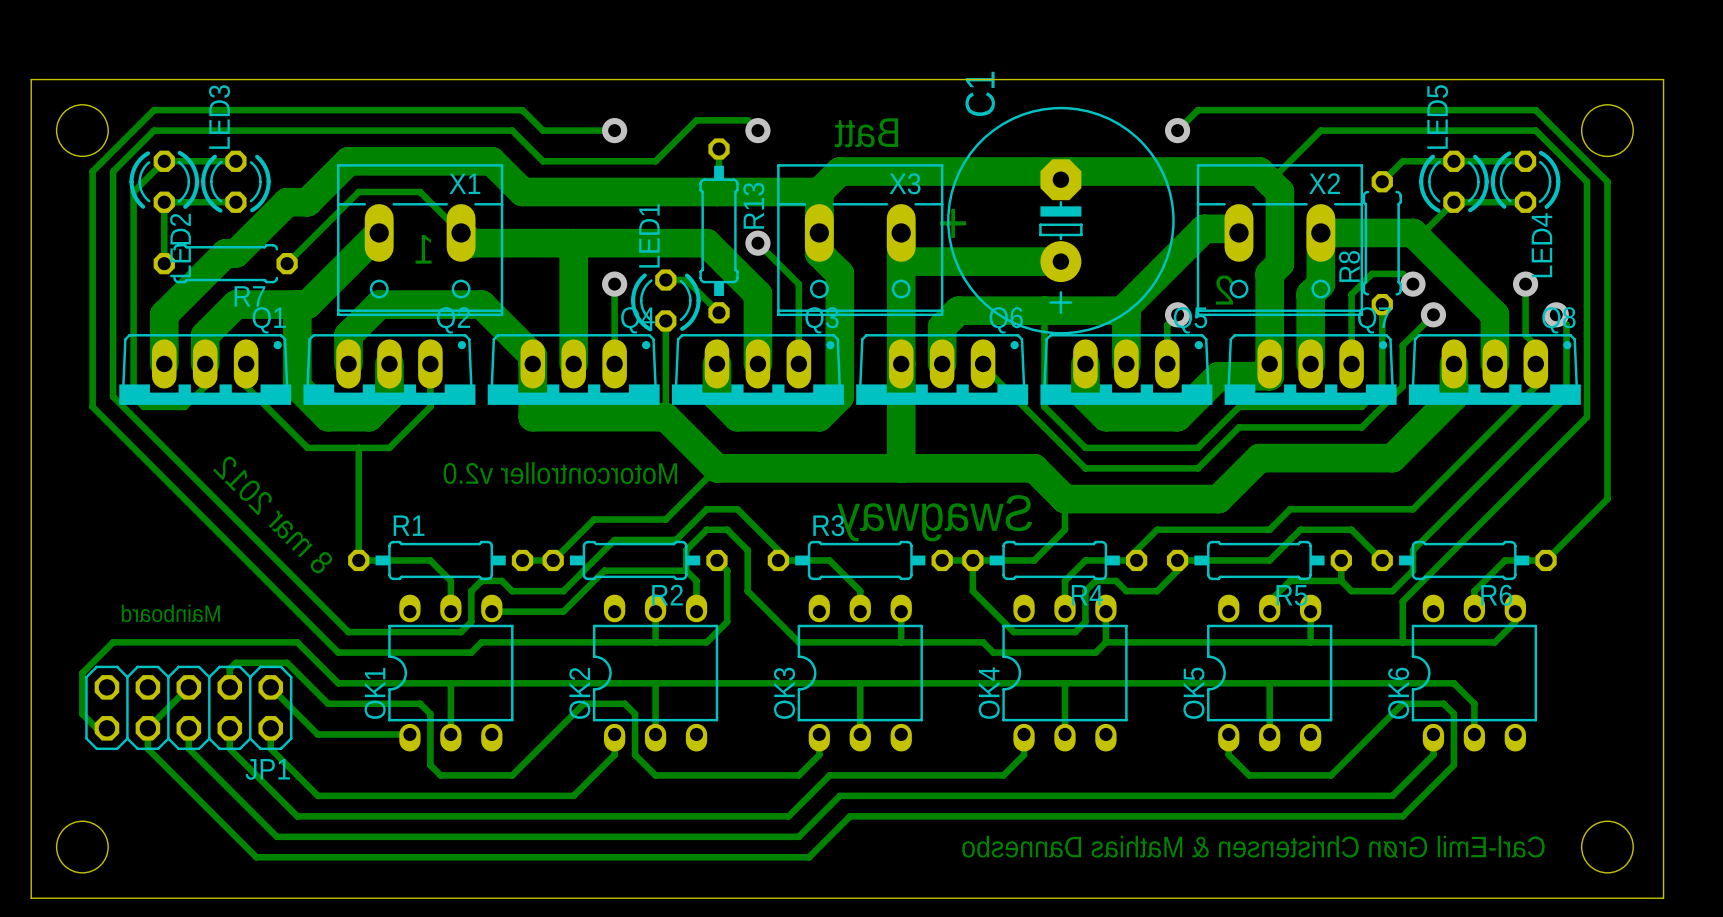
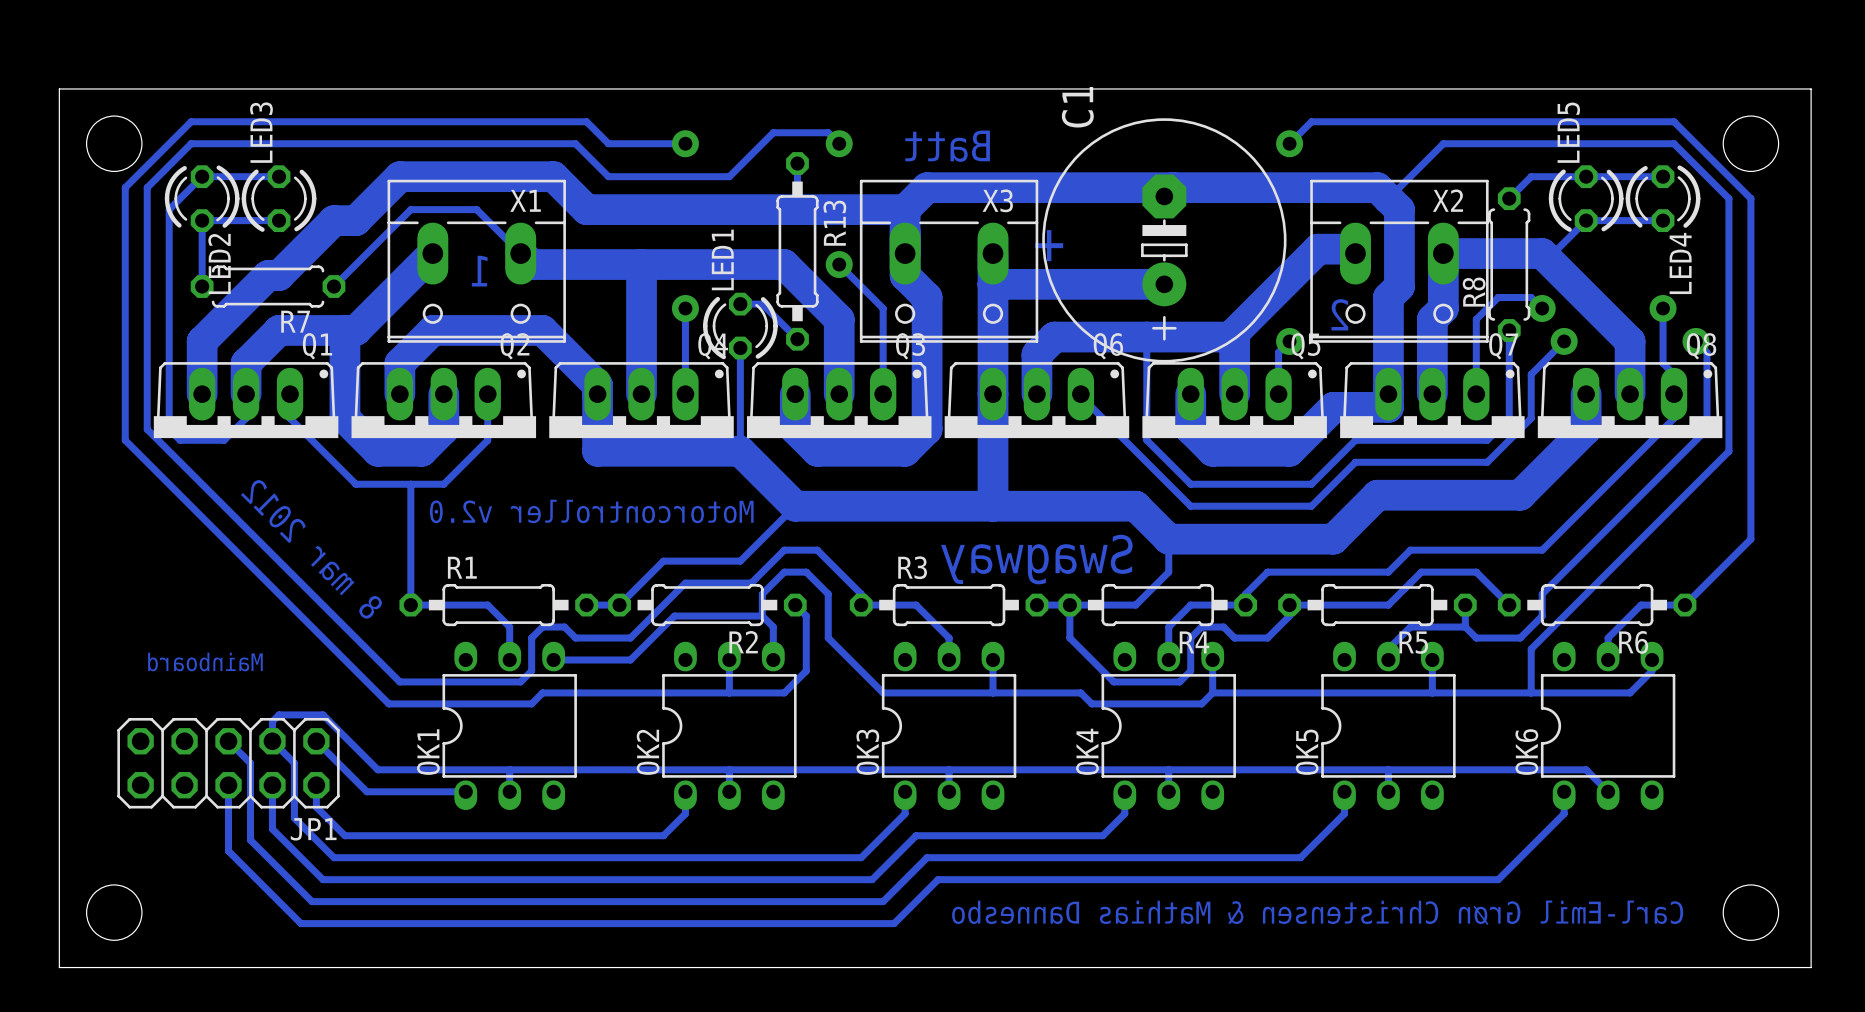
bottom track: (276, 662) (287, 662) (328, 703) (420, 703) (430, 714) (430, 765) (440, 775) -> (344, 835) (498, 835)
bottom track: (450, 683) (450, 714) -> none
bottom track: (655, 683) (655, 714) -> none
bottom track: (860, 683) (860, 714) -> none
bottom track: (1064, 683) (1064, 714) -> none
bottom track: (1269, 683) (1269, 714) -> none
bottom track: (188, 687) (147, 728) (147, 748) (188, 789) -> (228, 807) (228, 851)
bottom track: (106, 728) (96, 728) (82, 714) (82, 673) (113, 642) (297, 642) (338, 683) (1453, 683) (1474, 703) (1474, 734) -> (322, 714) (377, 769) (1586, 769) (1608, 791)
bottom track: (188, 748) (276, 836) -> (228, 741) (250, 763) (250, 840) (311, 901) (322, 901)
bottom track: (229, 748) (297, 816) -> (272, 807) (272, 829) (322, 879) (344, 879)
bottom track: (1228, 754) (1249, 775) (1331, 775) (1402, 703) (1443, 703) (1453, 714) (1453, 765) (1402, 816) (1372, 816) -> (1520, 857) (1498, 879)
bottom track: (297, 775) (317, 795) -> (272, 741) (294, 763) (294, 818) (333, 857) (366, 857)
bottom track: (512, 775) (583, 703) (624, 703) (635, 714) (635, 754) (655, 775) (798, 775) -> (641, 857) (861, 857) (883, 835)
bottom track: (594, 775) (573, 795) -> (663, 835) (575, 835)
bottom track: (1187, 795) (1392, 795) -> (1300, 857) (1344, 813)

